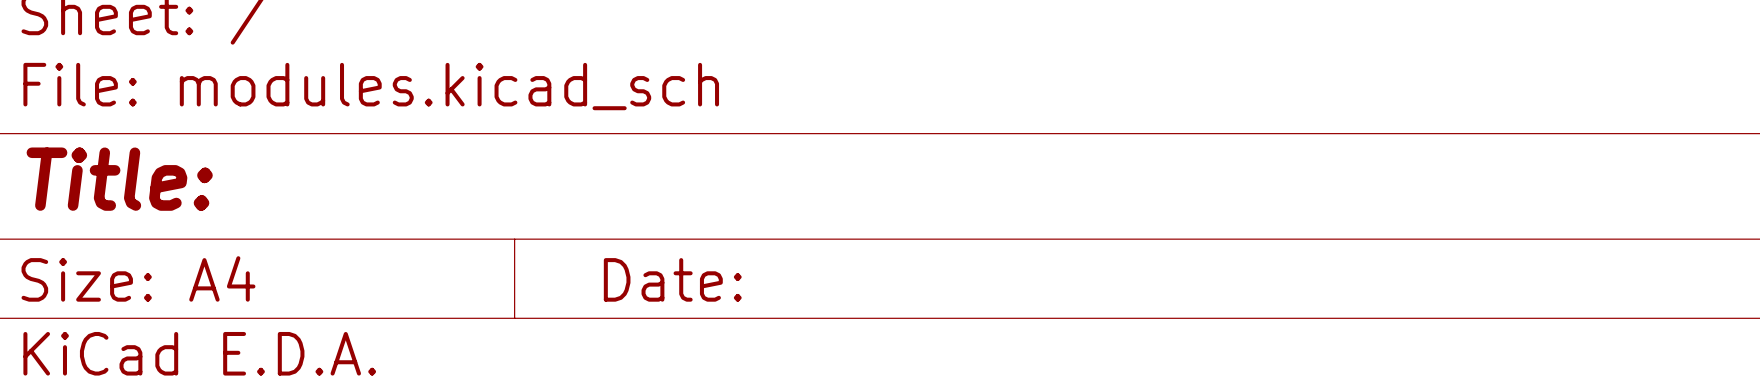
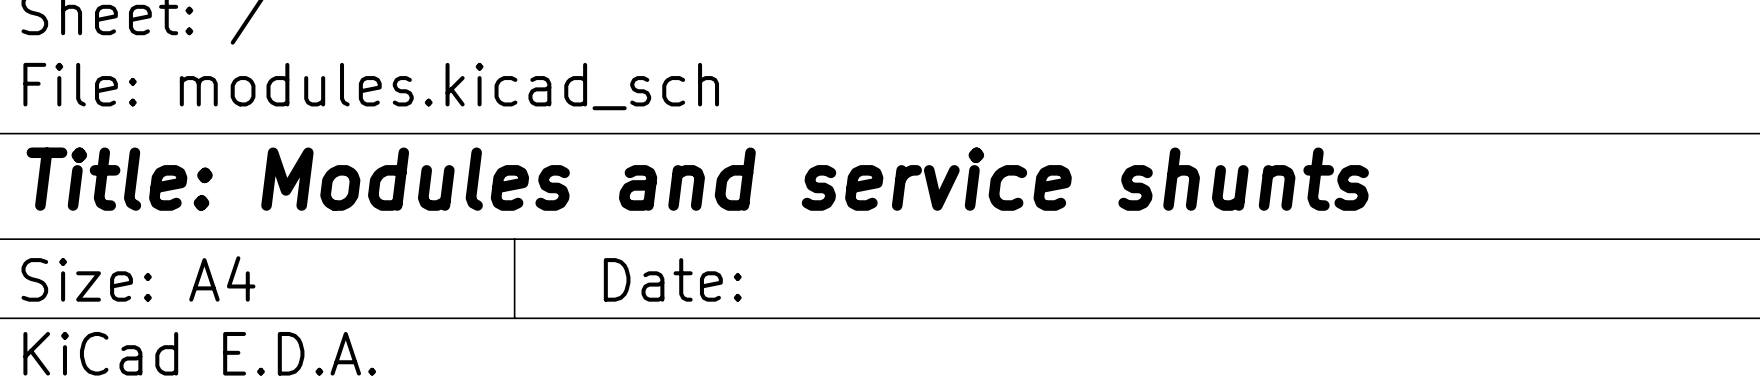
title block: Title: (119, 179) -> Title: Modules and service shunts (697, 179)

